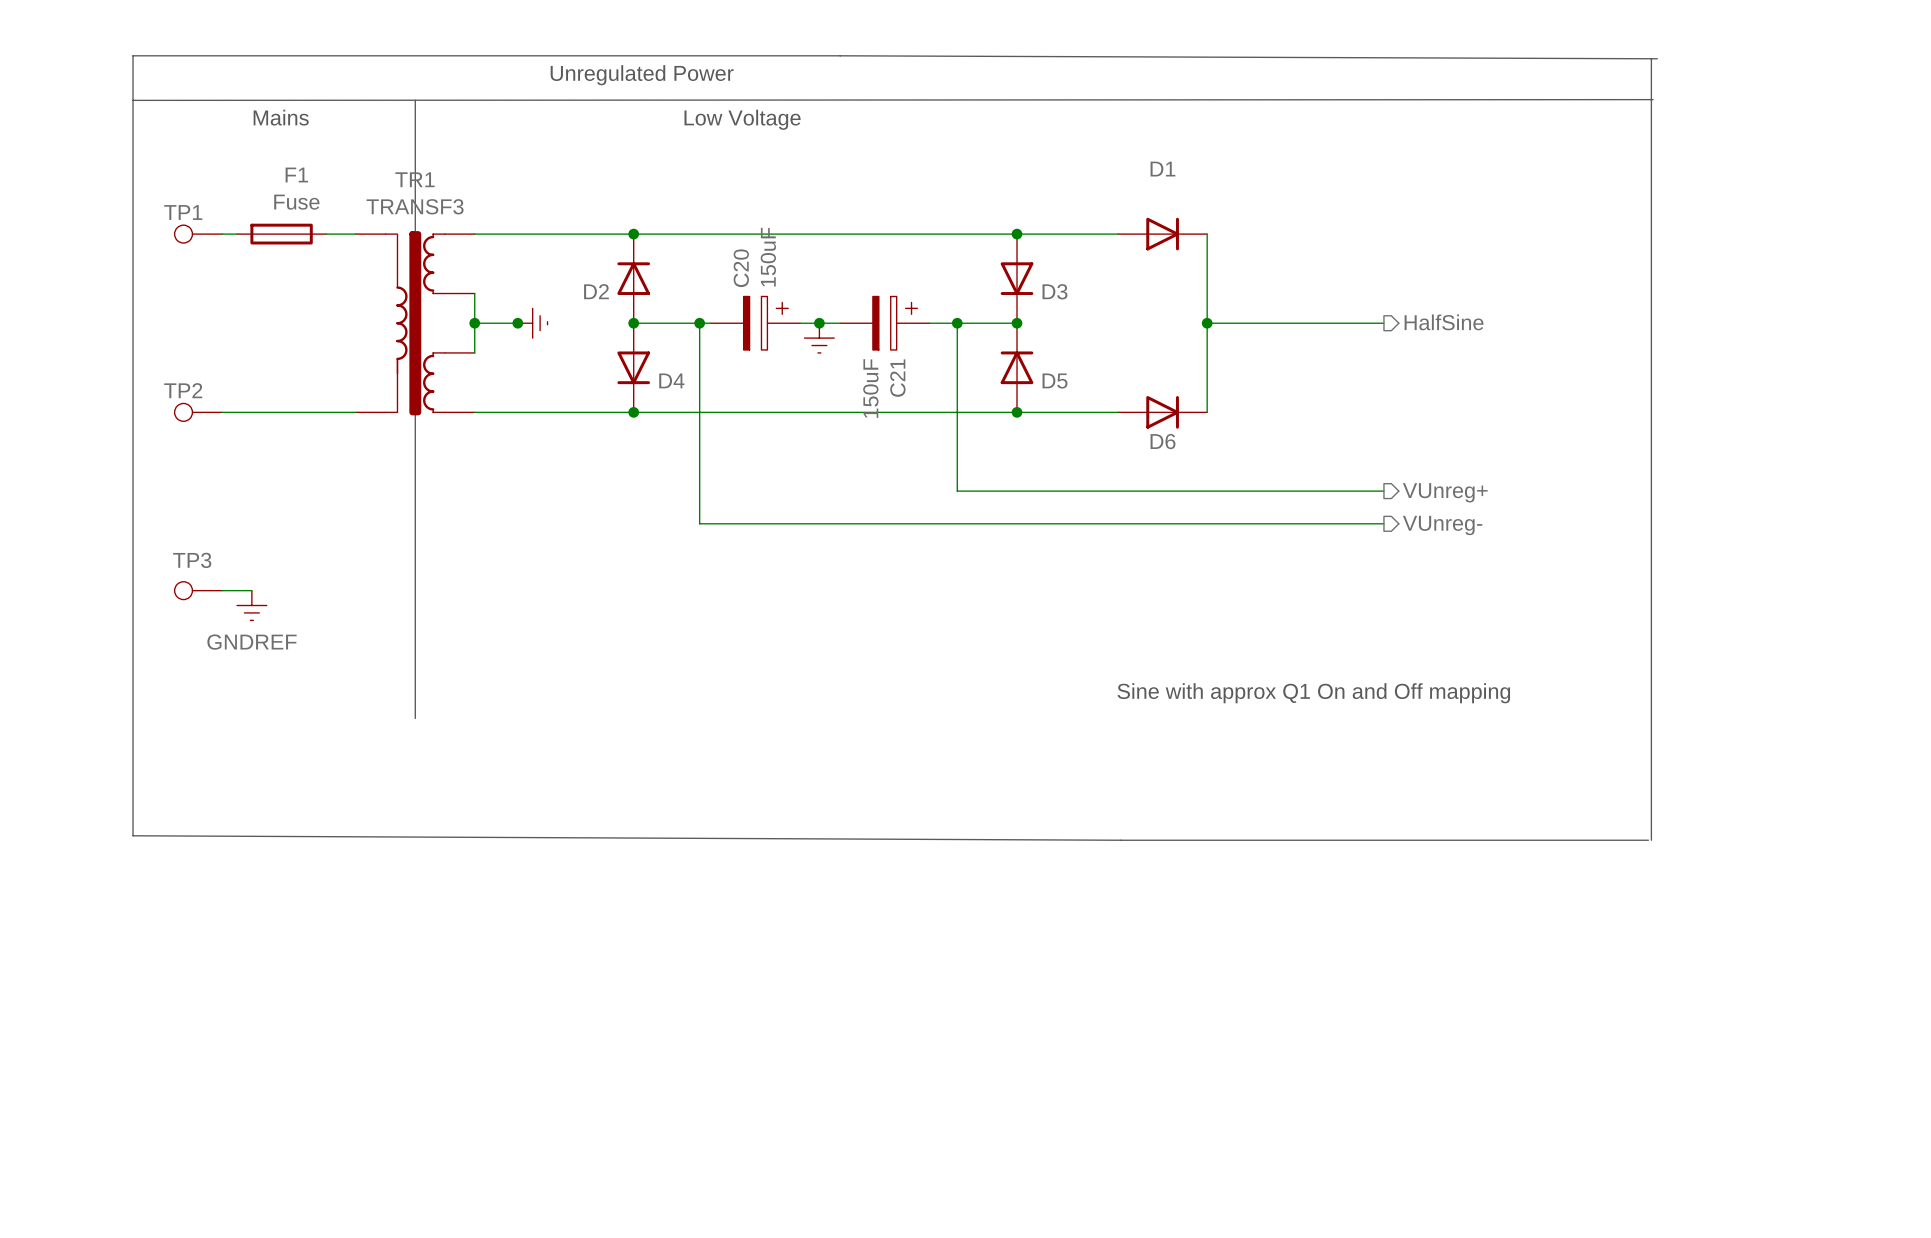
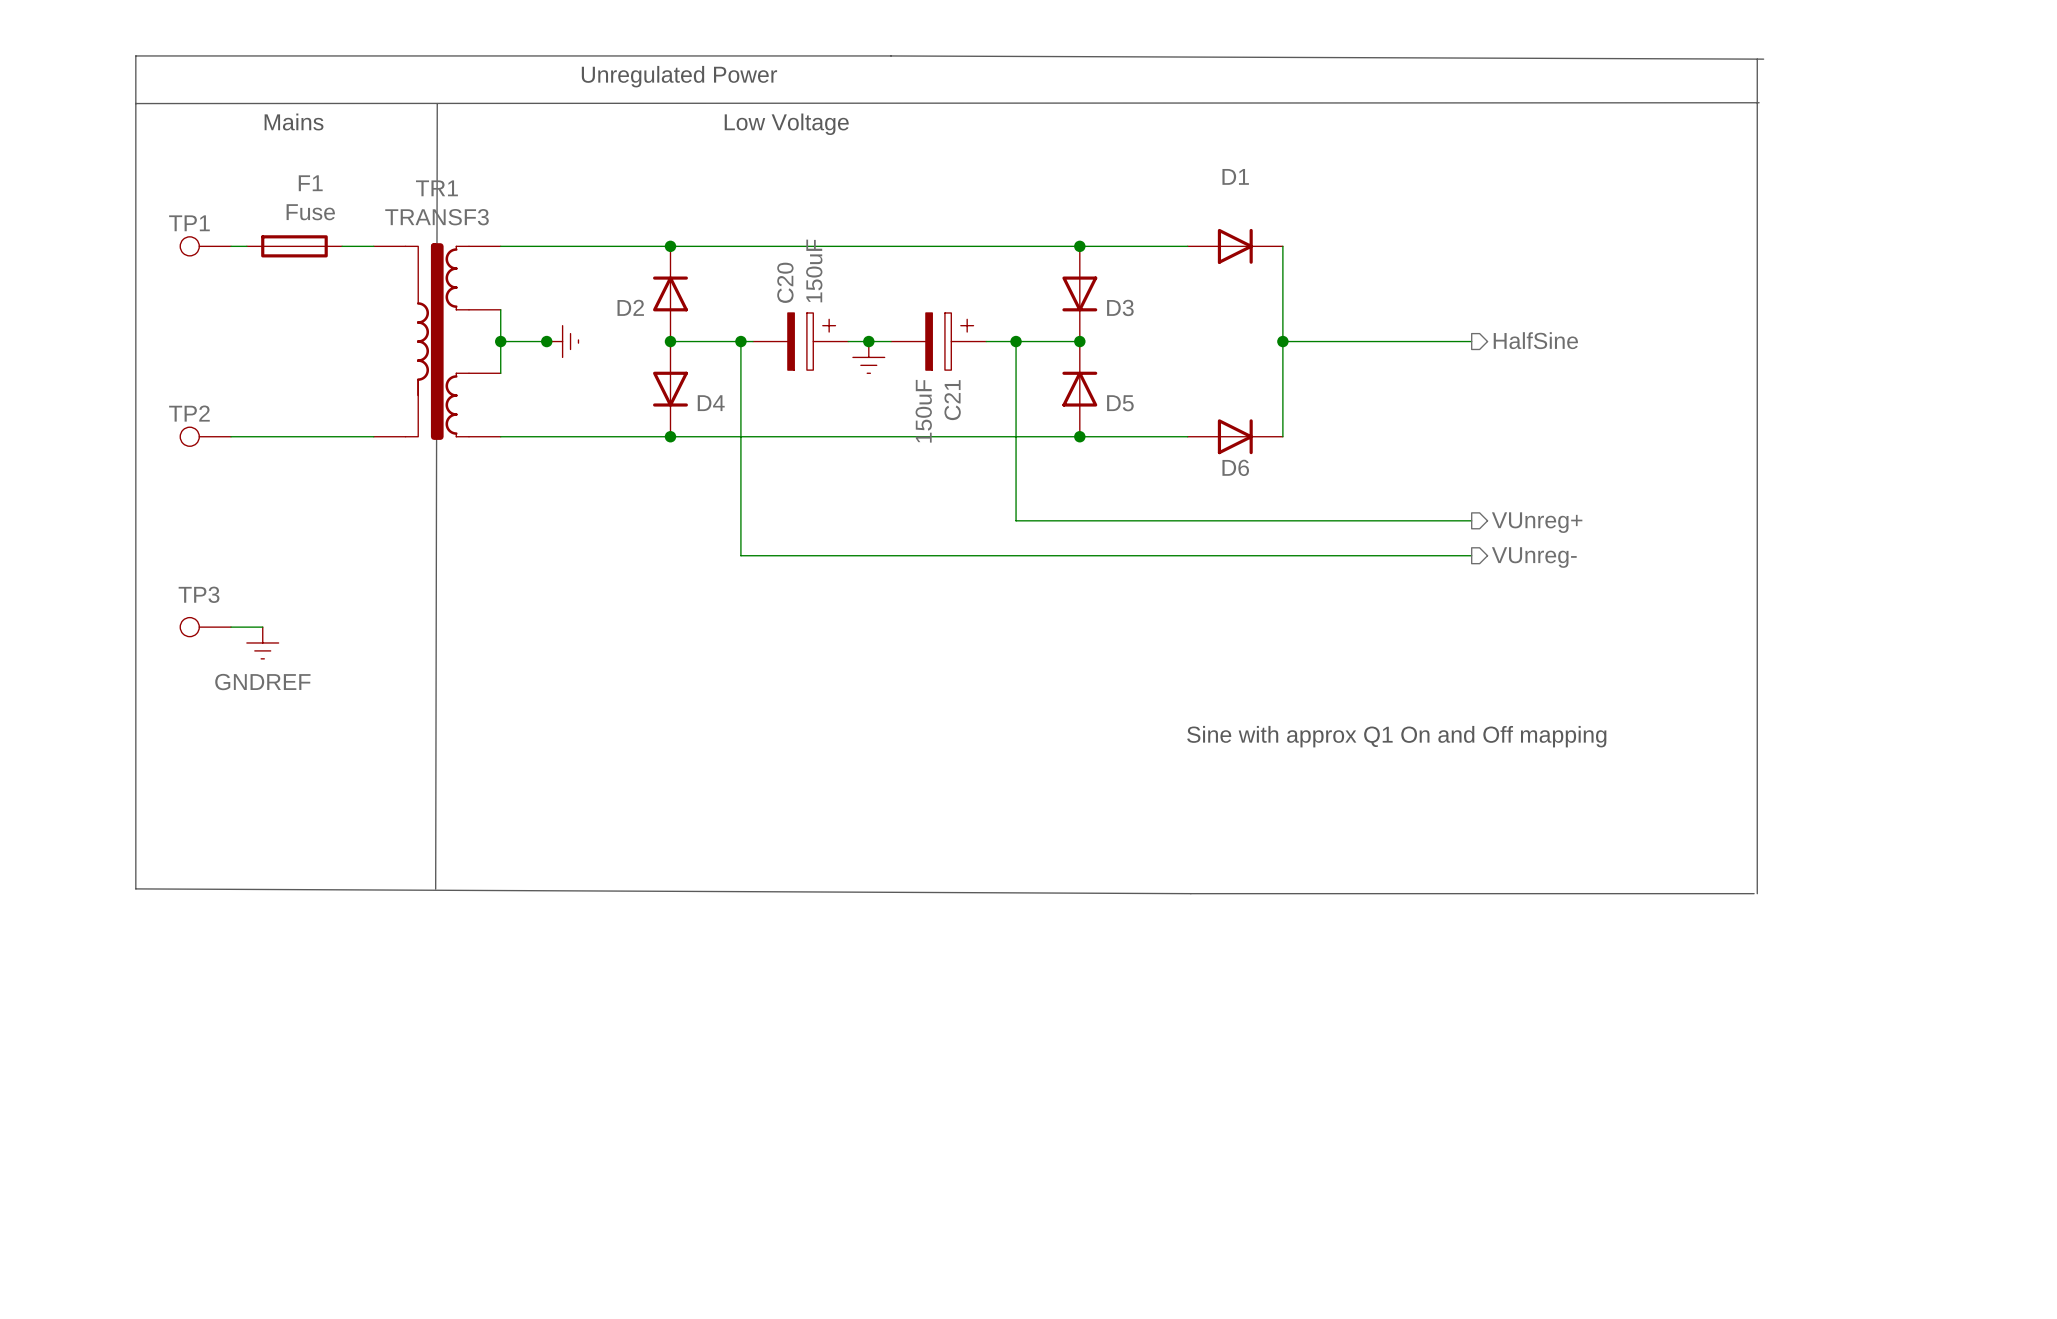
line: (415, 100) (415, 718) -> (437, 103) (435, 888)

